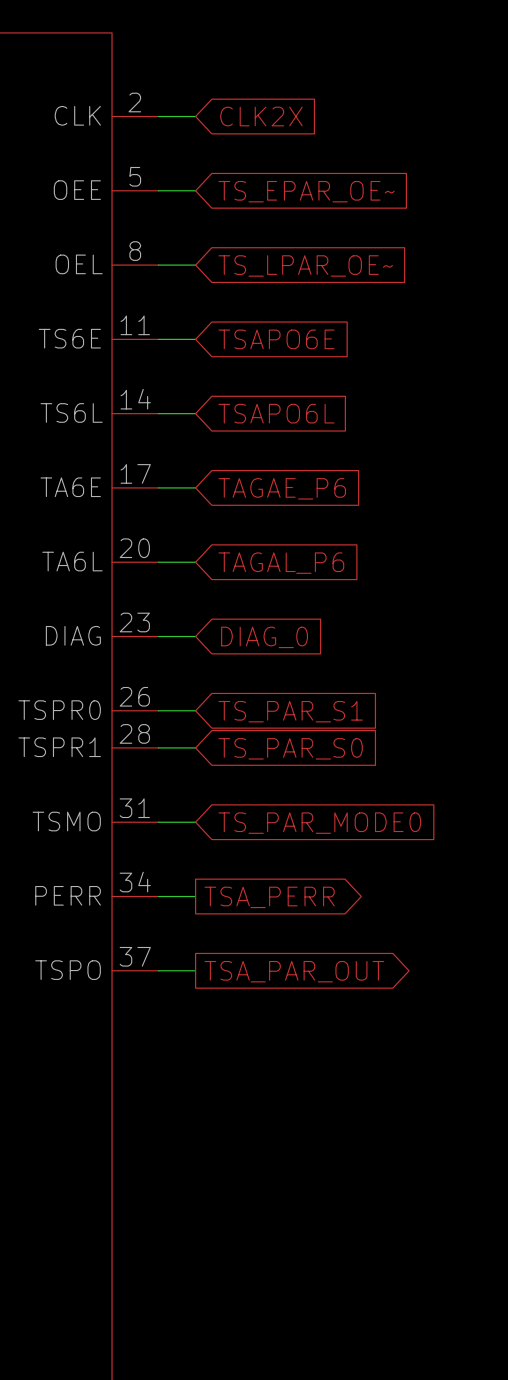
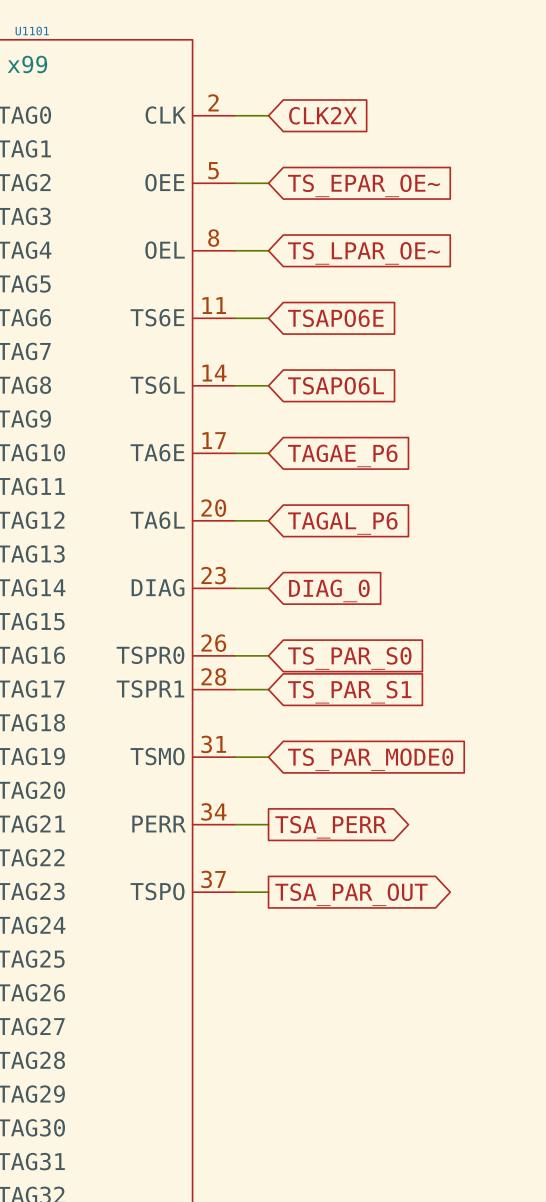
global label: TS_PAR_S1 (290, 711) -> TS_PAR_S0 (349, 658)
global label: TS_PAR_S0 (290, 748) -> TS_PAR_S1 (349, 692)

